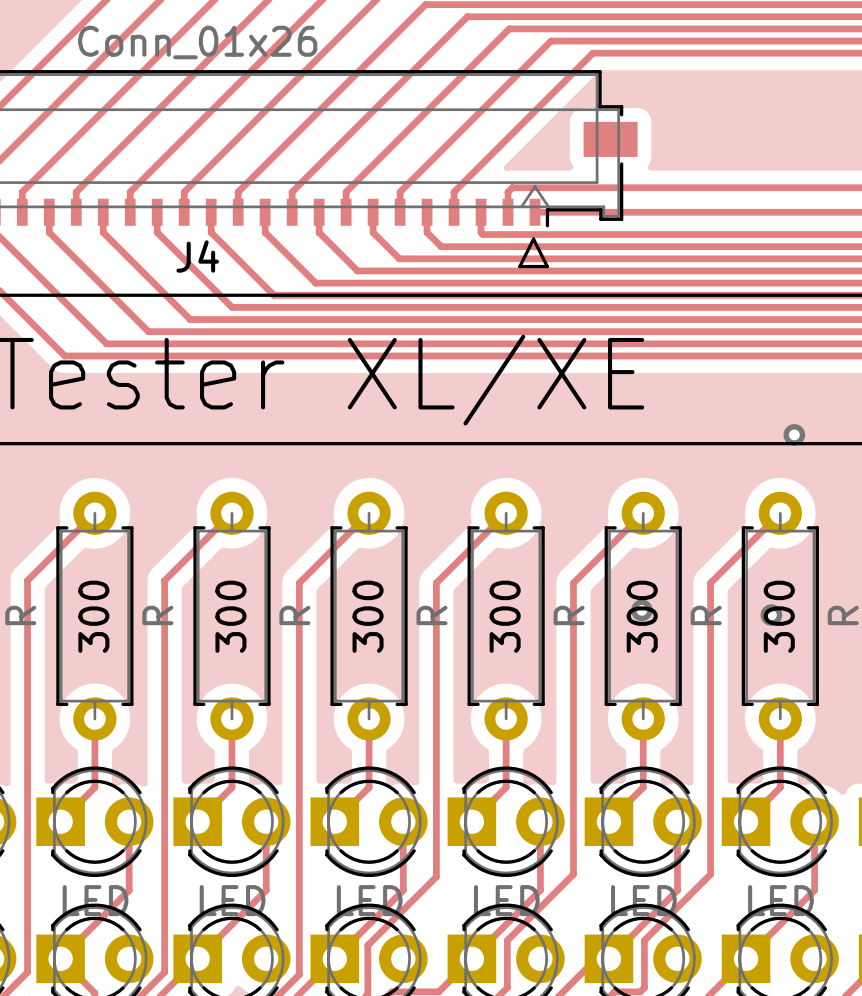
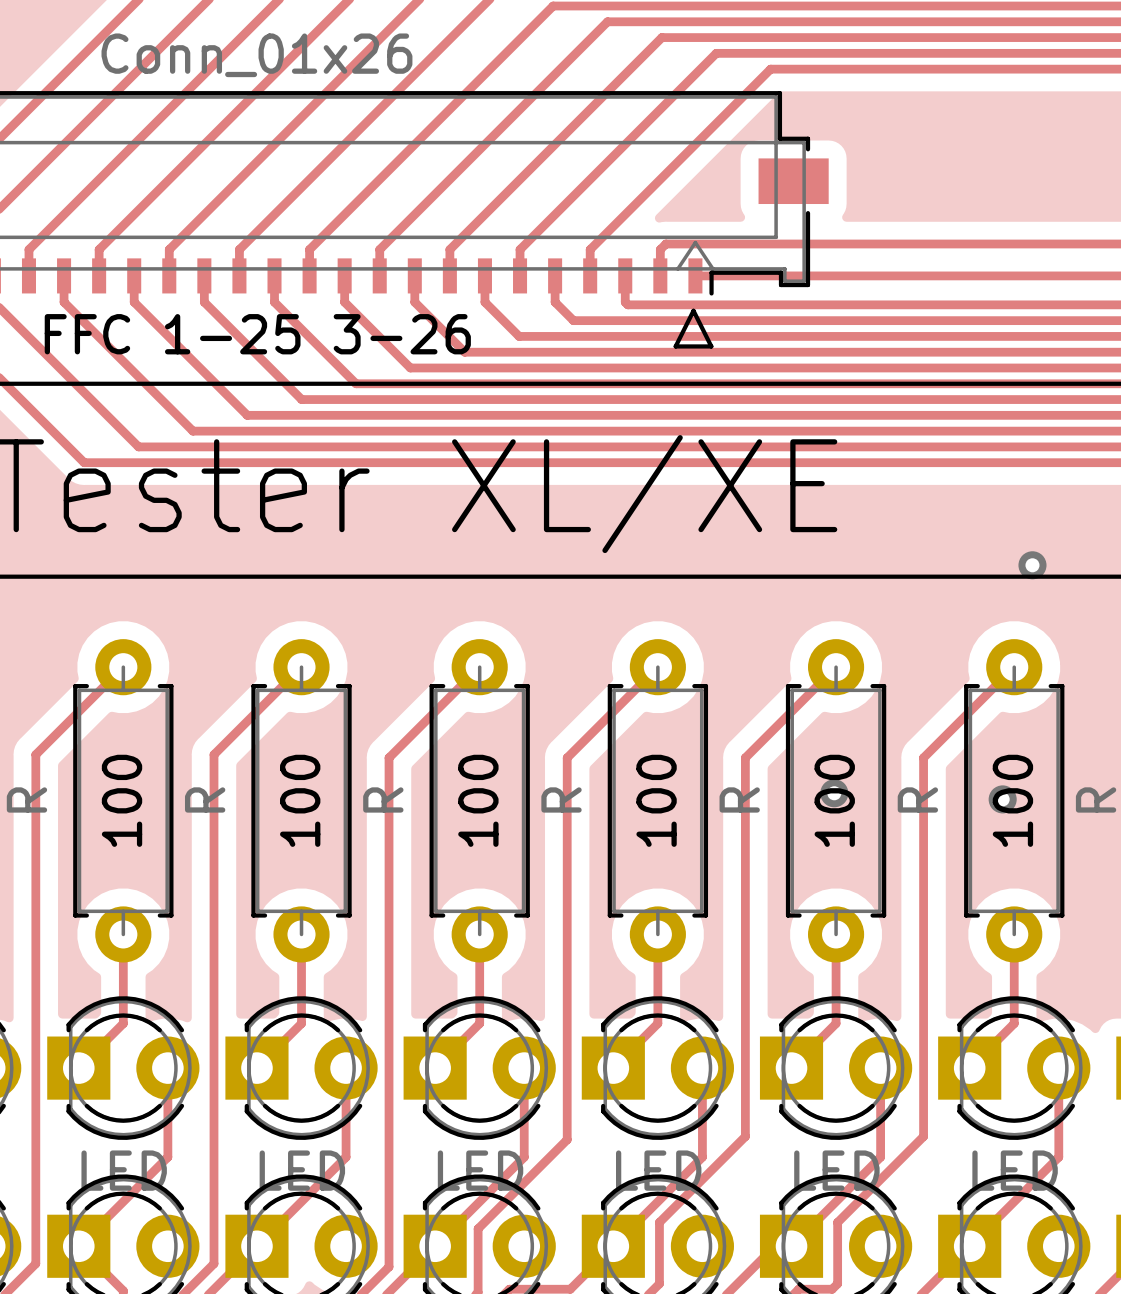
J4 name: J4 (197, 256) -> FFC 1-25 3-26 (257, 334)
300 name: 300 (93, 616) -> 100 (122, 800)
300 name: 300 (230, 616) -> 100 (300, 800)
300 name: 300 (368, 616) -> 100 (478, 800)
300 name: 300 (505, 616) -> 100 (656, 800)
300 name: 300 (642, 616) -> 100 (834, 800)
300 name: 300 (779, 616) -> 100 (1012, 800)

